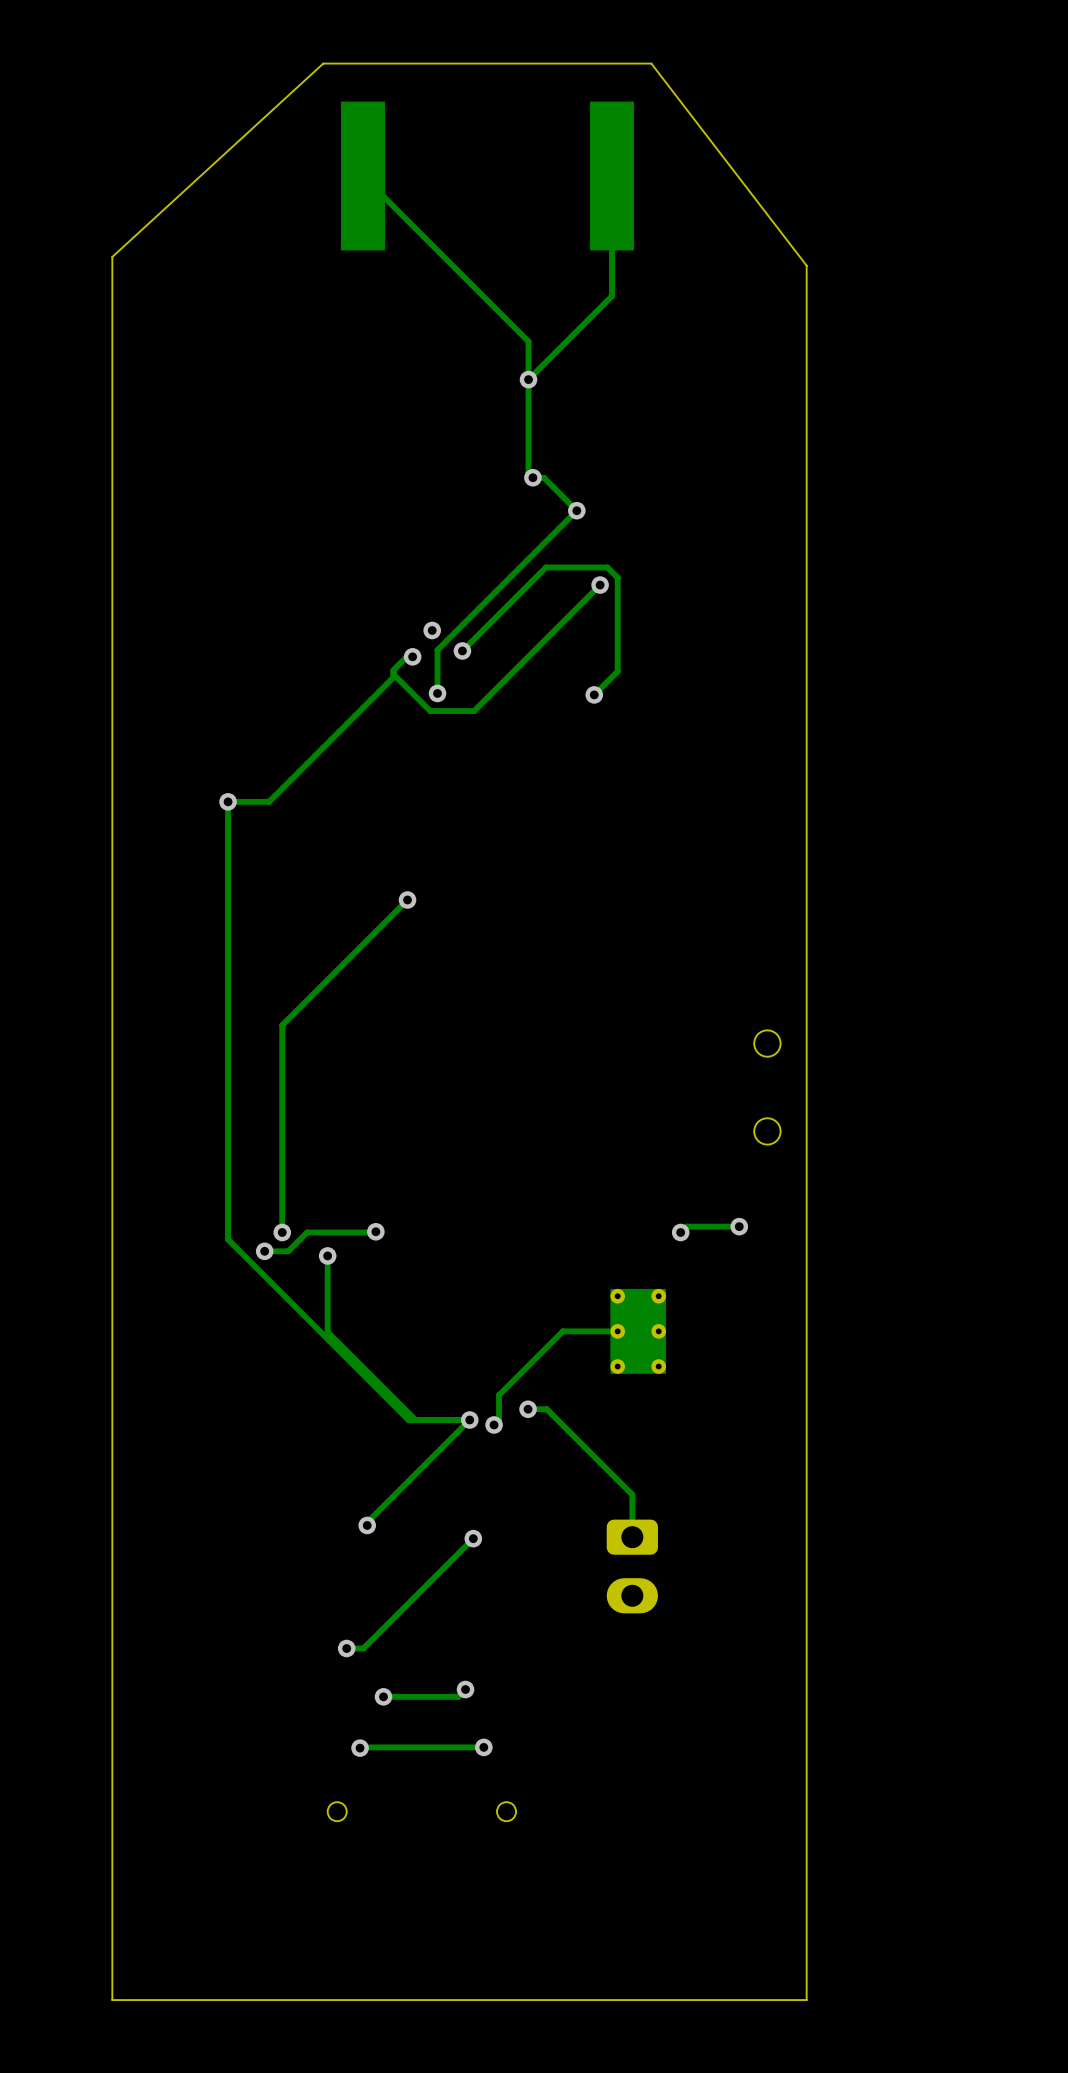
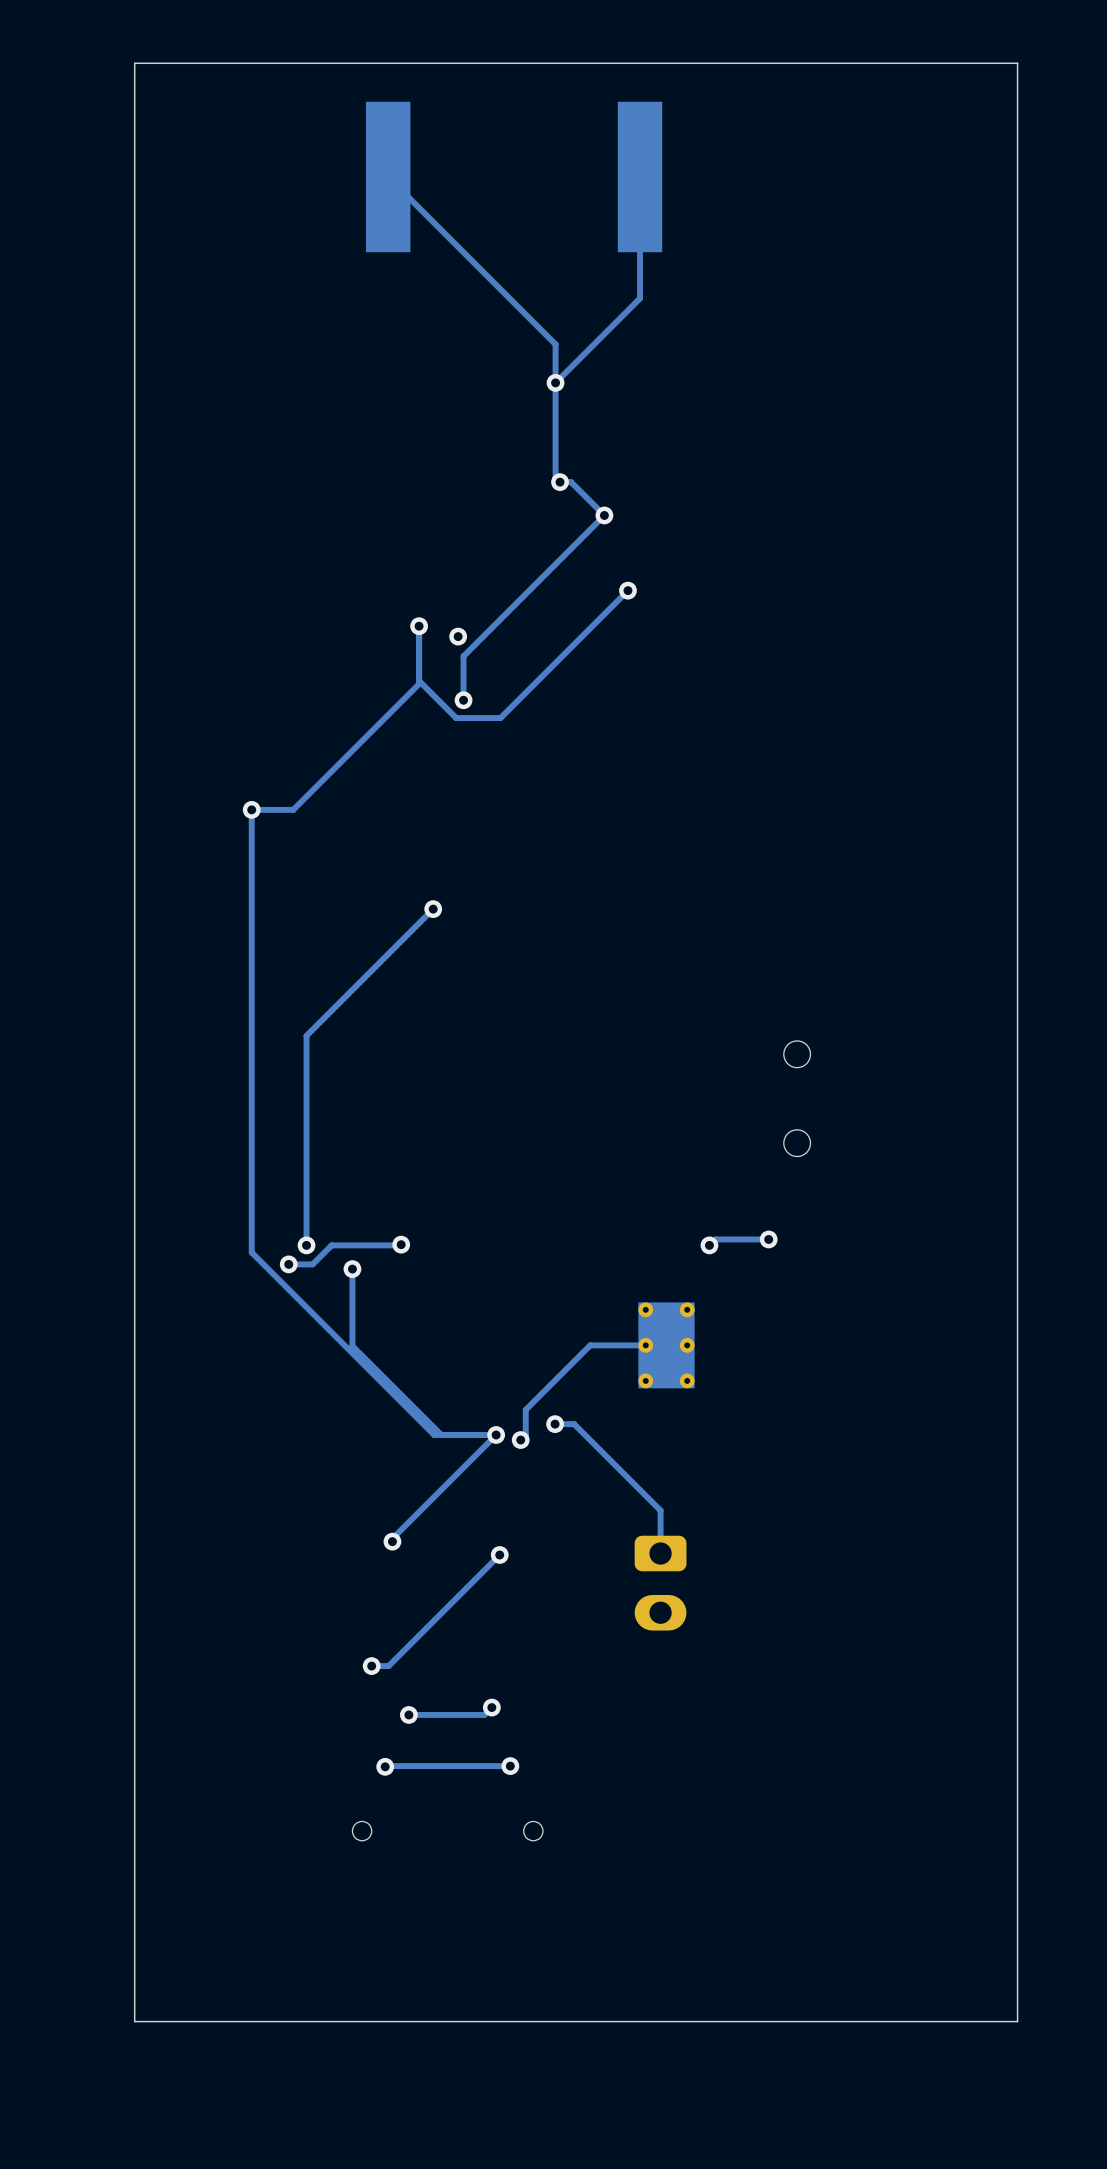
board edge: (323, 63) (112, 256) -> (348, 63) (134, 63) (134, 258)
board edge: (651, 63) (806, 265) (806, 2000) -> (679, 63) (1017, 63) (1017, 2021) (836, 2021)
via: none -> (419, 626)
track: (462, 650) (545, 567) (607, 567) (617, 577) (617, 671) (594, 694) -> none
via: (462, 650) -> none
track: (412, 656) (406, 656) (393, 670) -> (419, 626) (419, 676)
via: (412, 656) -> none
via: (594, 694) -> none

